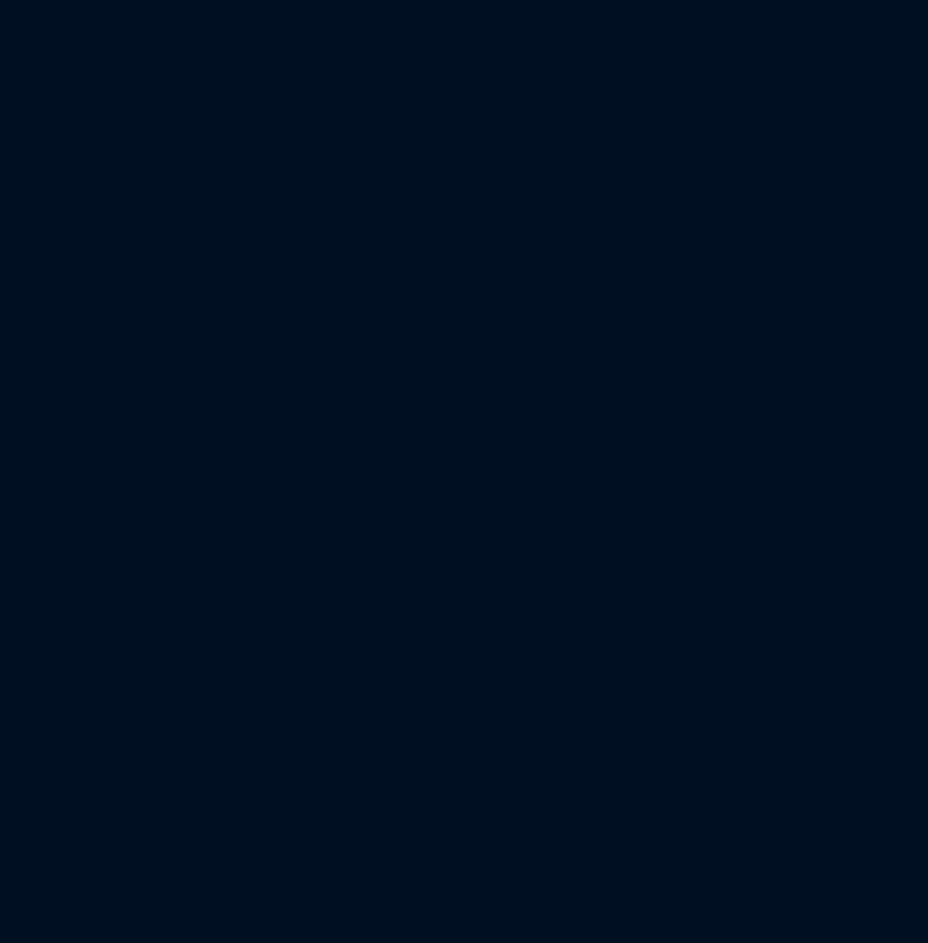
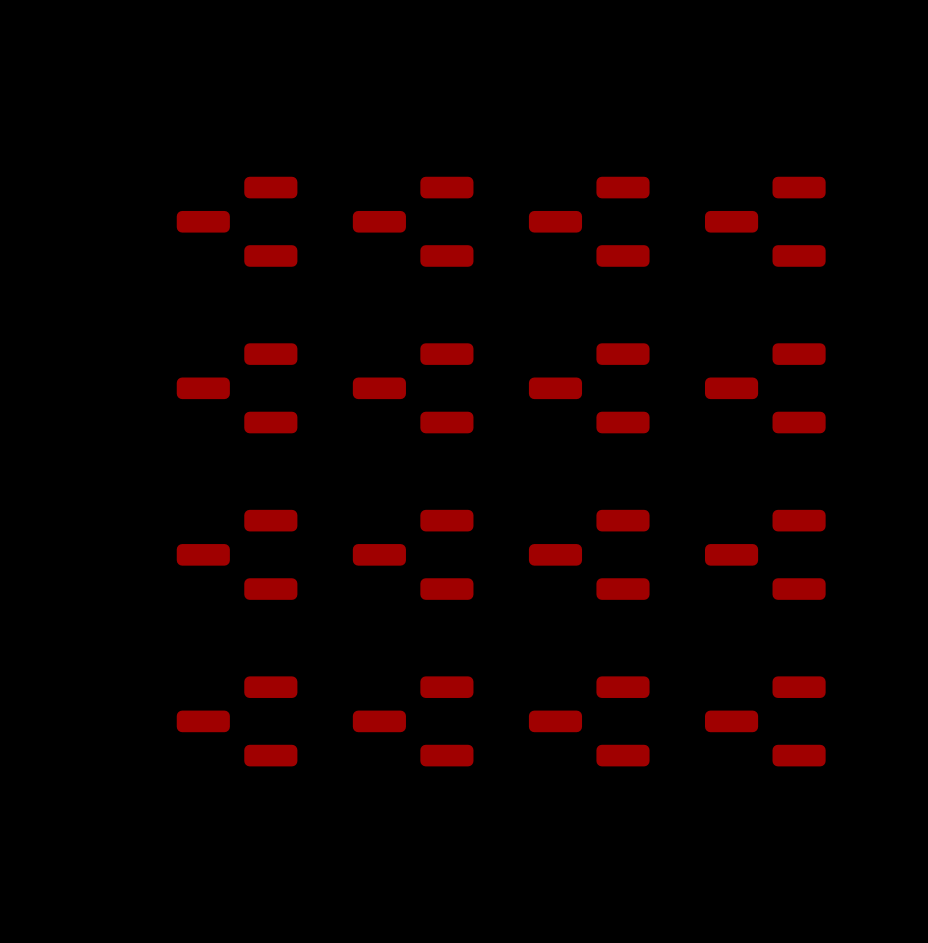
part: none -> (237, 221)
part: none -> (413, 221)
part: none -> (589, 221)
part: none -> (765, 221)
part: none -> (237, 388)
part: none -> (413, 388)
part: none -> (589, 388)
part: none -> (765, 388)
part: none -> (237, 554)
part: none -> (413, 554)
part: none -> (589, 554)
part: none -> (765, 554)
part: none -> (237, 721)
part: none -> (413, 721)
part: none -> (589, 721)
part: none -> (765, 721)

